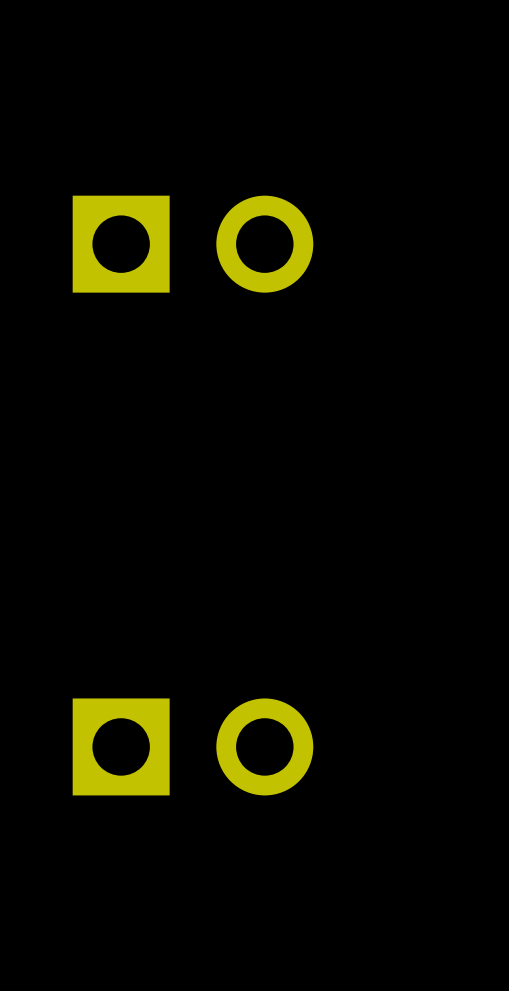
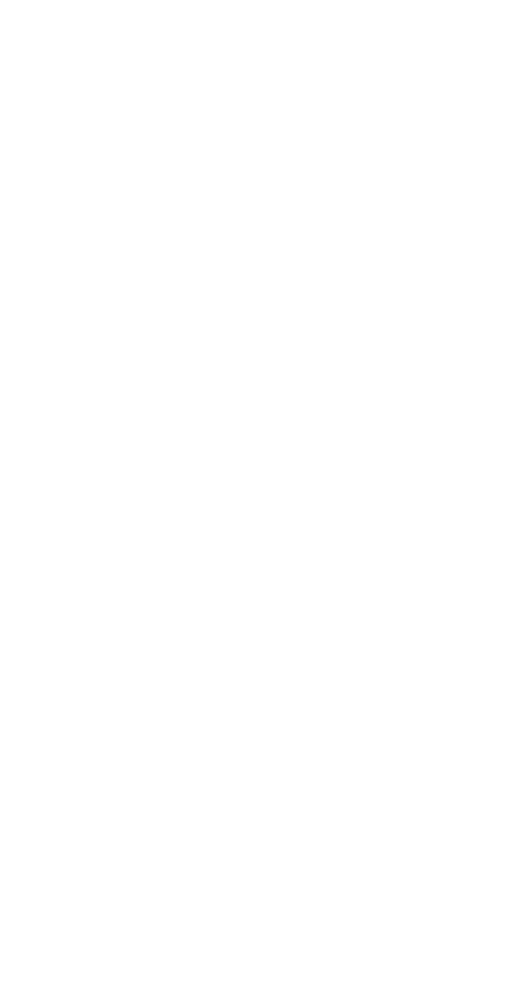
part: (192, 244) -> none
part: (192, 746) -> none

